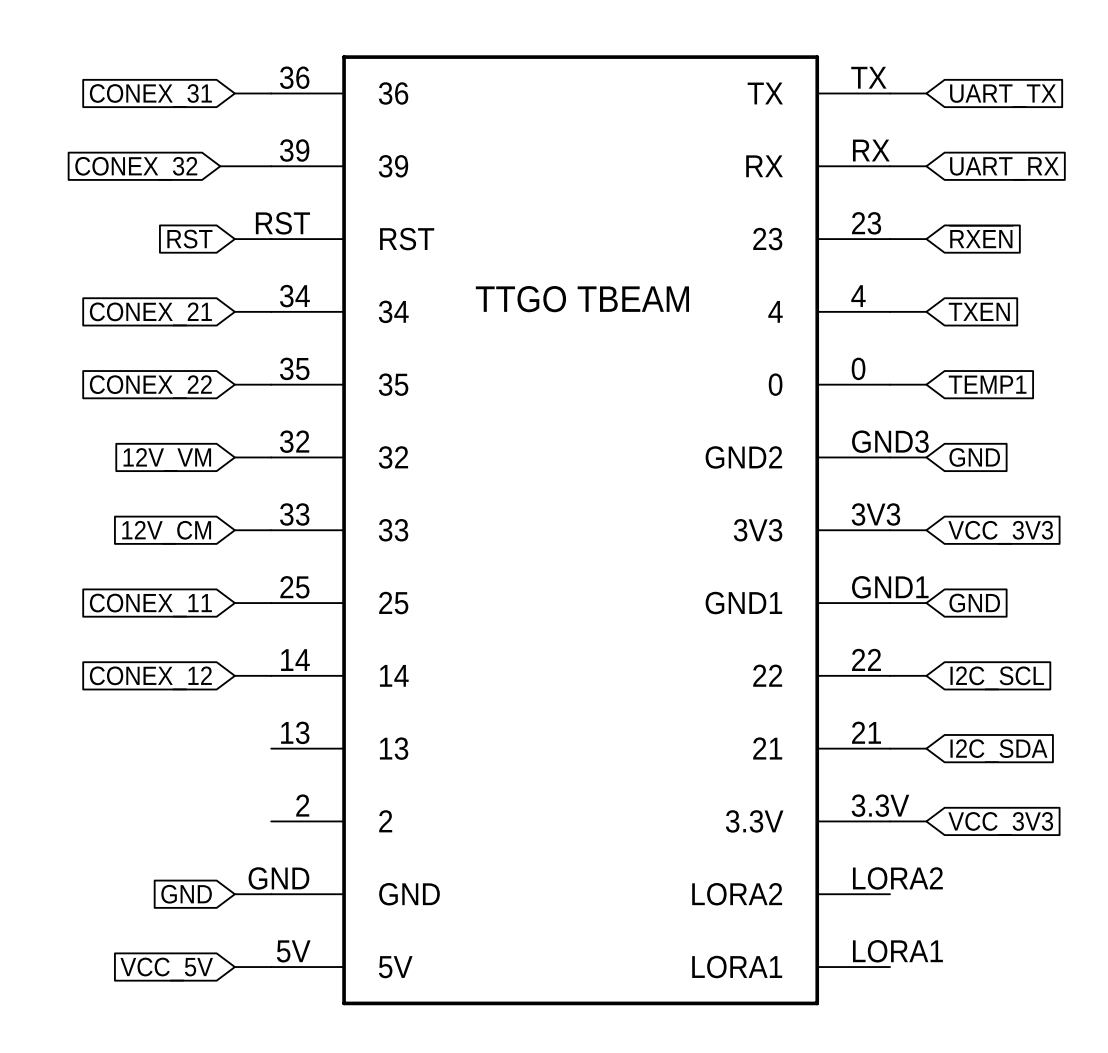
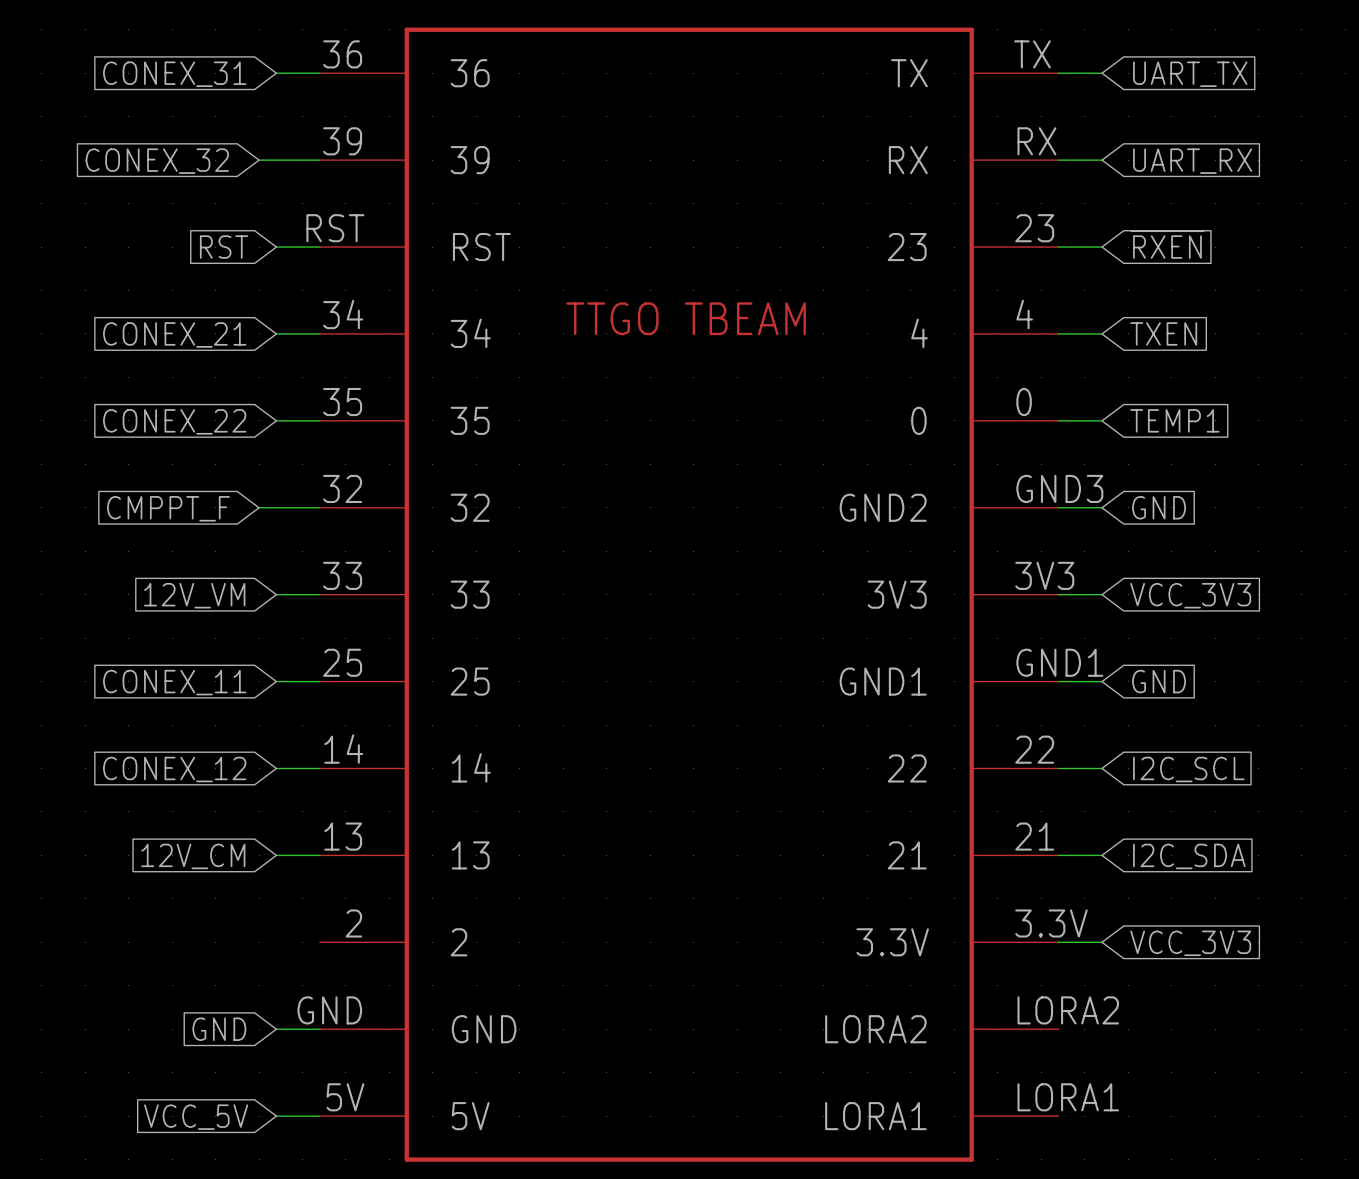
wire: none -> (259, 507) (276, 507)
global label: none -> CMPPT_F (168, 508)
global label: 12V_VM (167, 459) -> none
global label: 12V_CM (166, 532) -> 12V_VM (194, 595)
wire: none -> (276, 855) (319, 855)
global label: none -> 12V_CM (193, 856)

